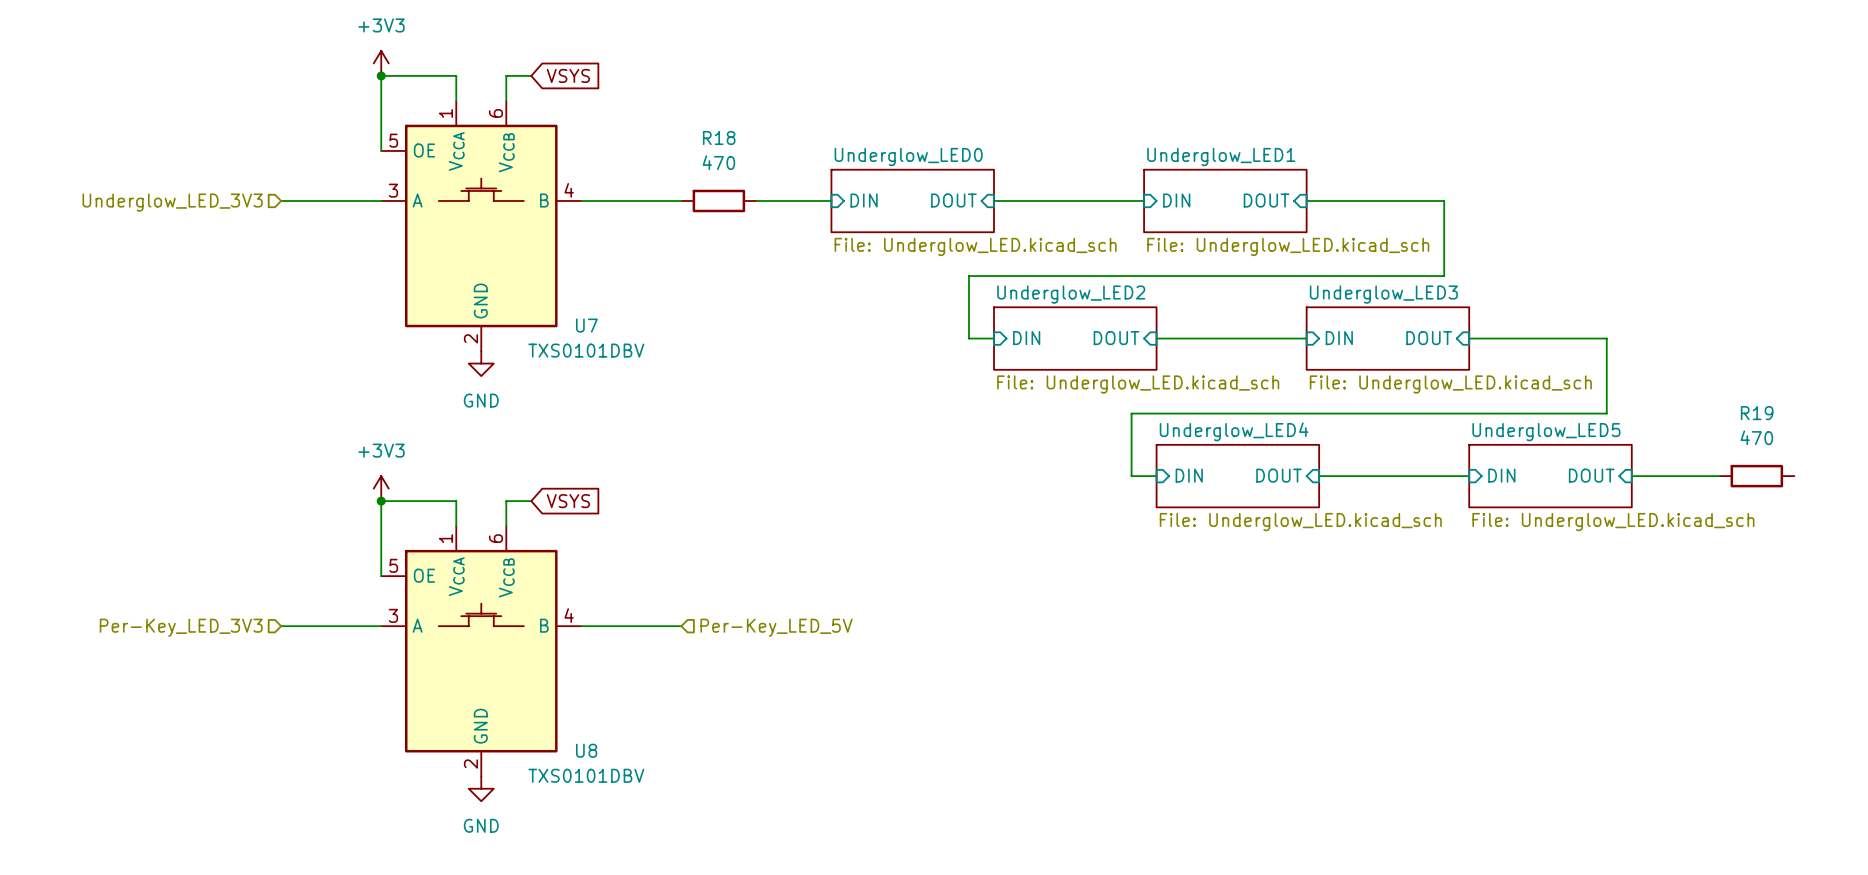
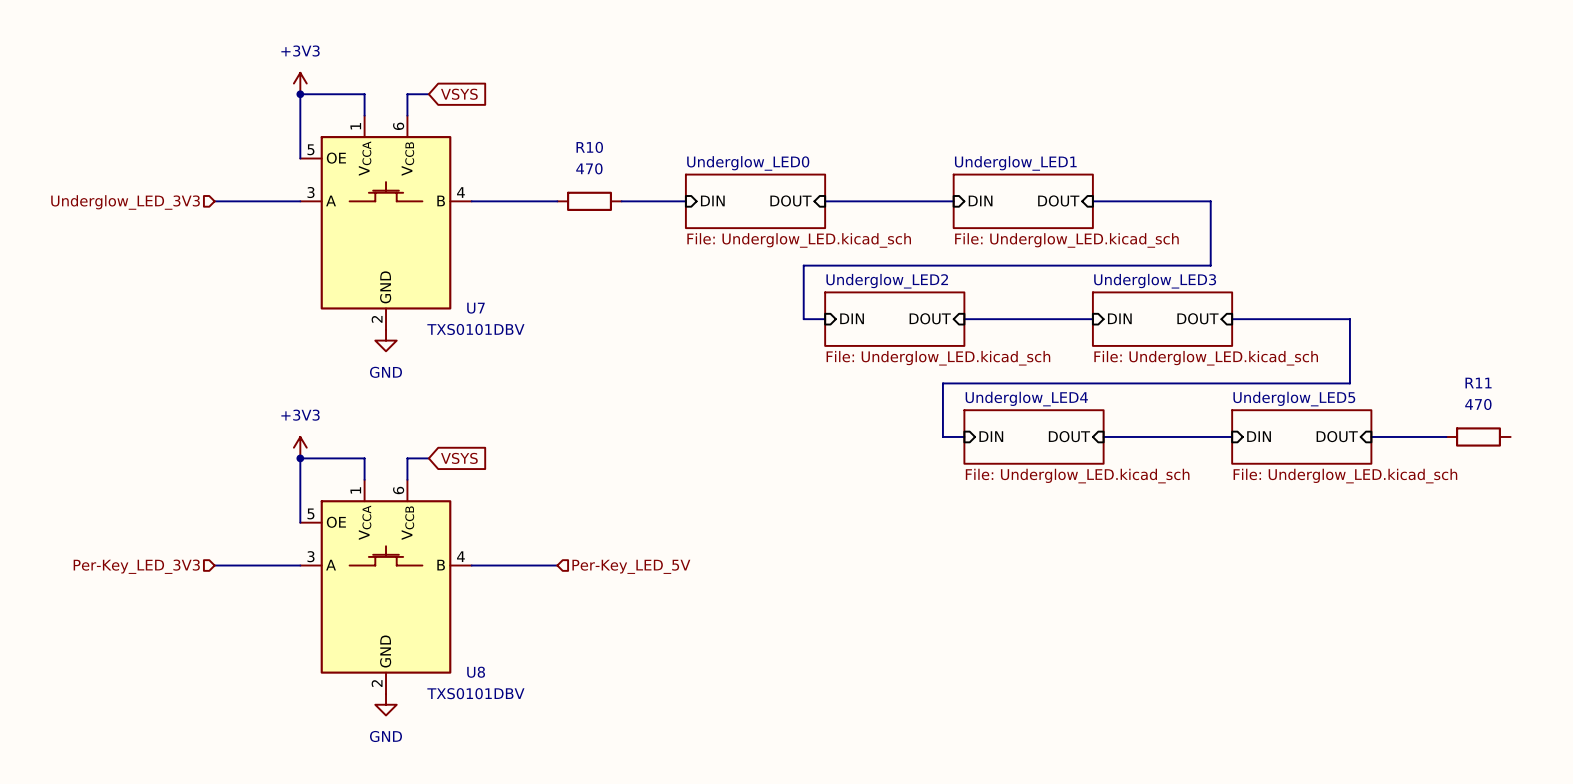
R18 name: R18 (719, 137) -> R10 (589, 147)
R19 name: R19 (1757, 413) -> R11 (1478, 383)

